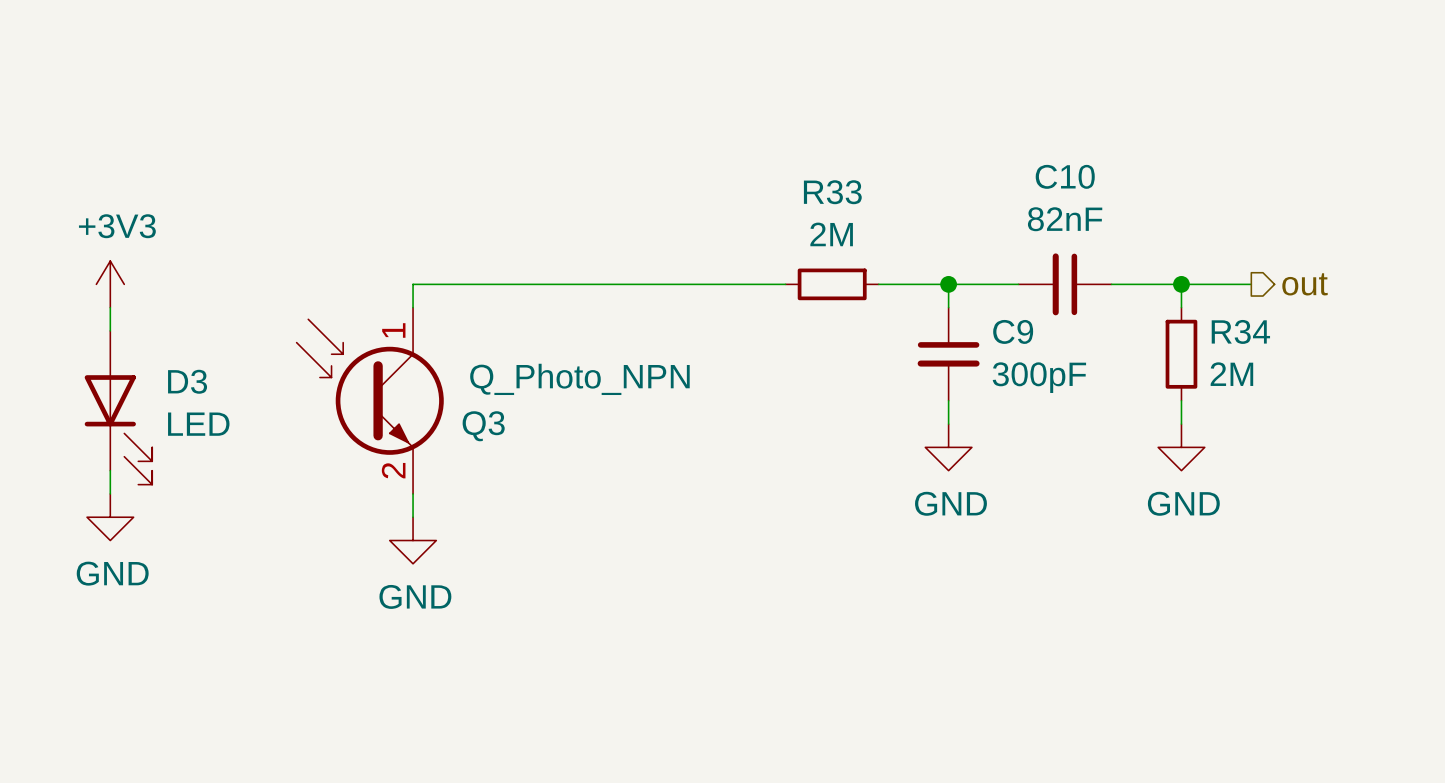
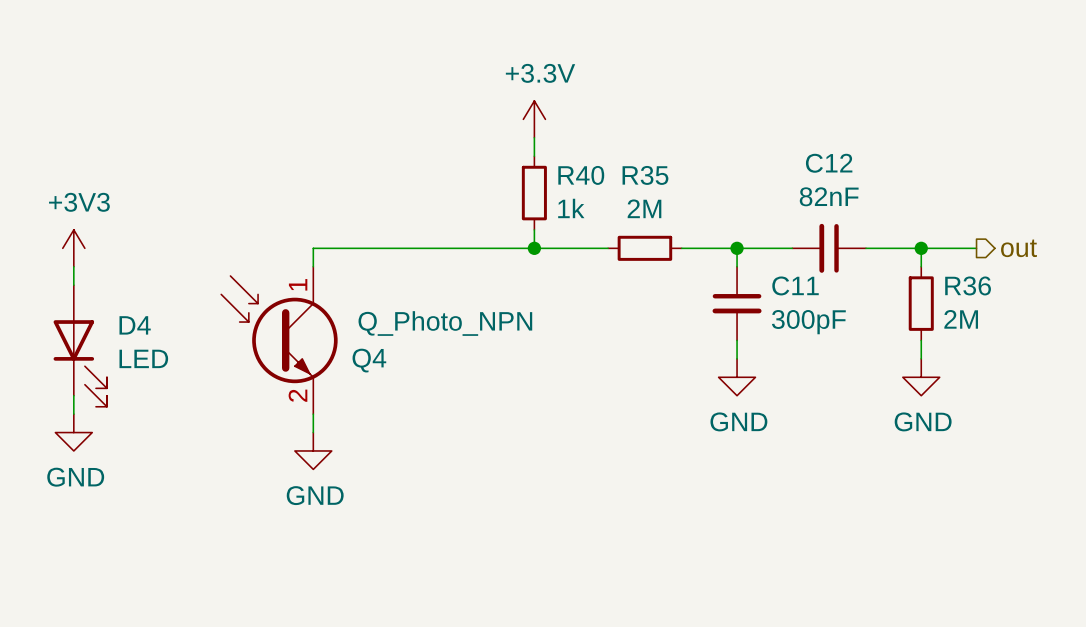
power symbol: none -> +3.3V (534, 119)
wire: none -> (534, 137) (534, 156)
C10 name: C10 (1065, 176) -> C12 (829, 163)
R33 name: R33 (832, 192) -> R35 (645, 175)
R40: none -> 1k (534, 193)
wire: none -> (534, 229) (534, 248)
junction: none -> (534, 248)
C9 name: C9 (1013, 331) -> C11 (795, 285)
R34 name: R34 (1240, 331) -> R36 (968, 285)
D3 name: D3 (187, 381) -> D4 (135, 325)
Q3 name: Q3 (483, 426) -> Q4 (369, 360)

